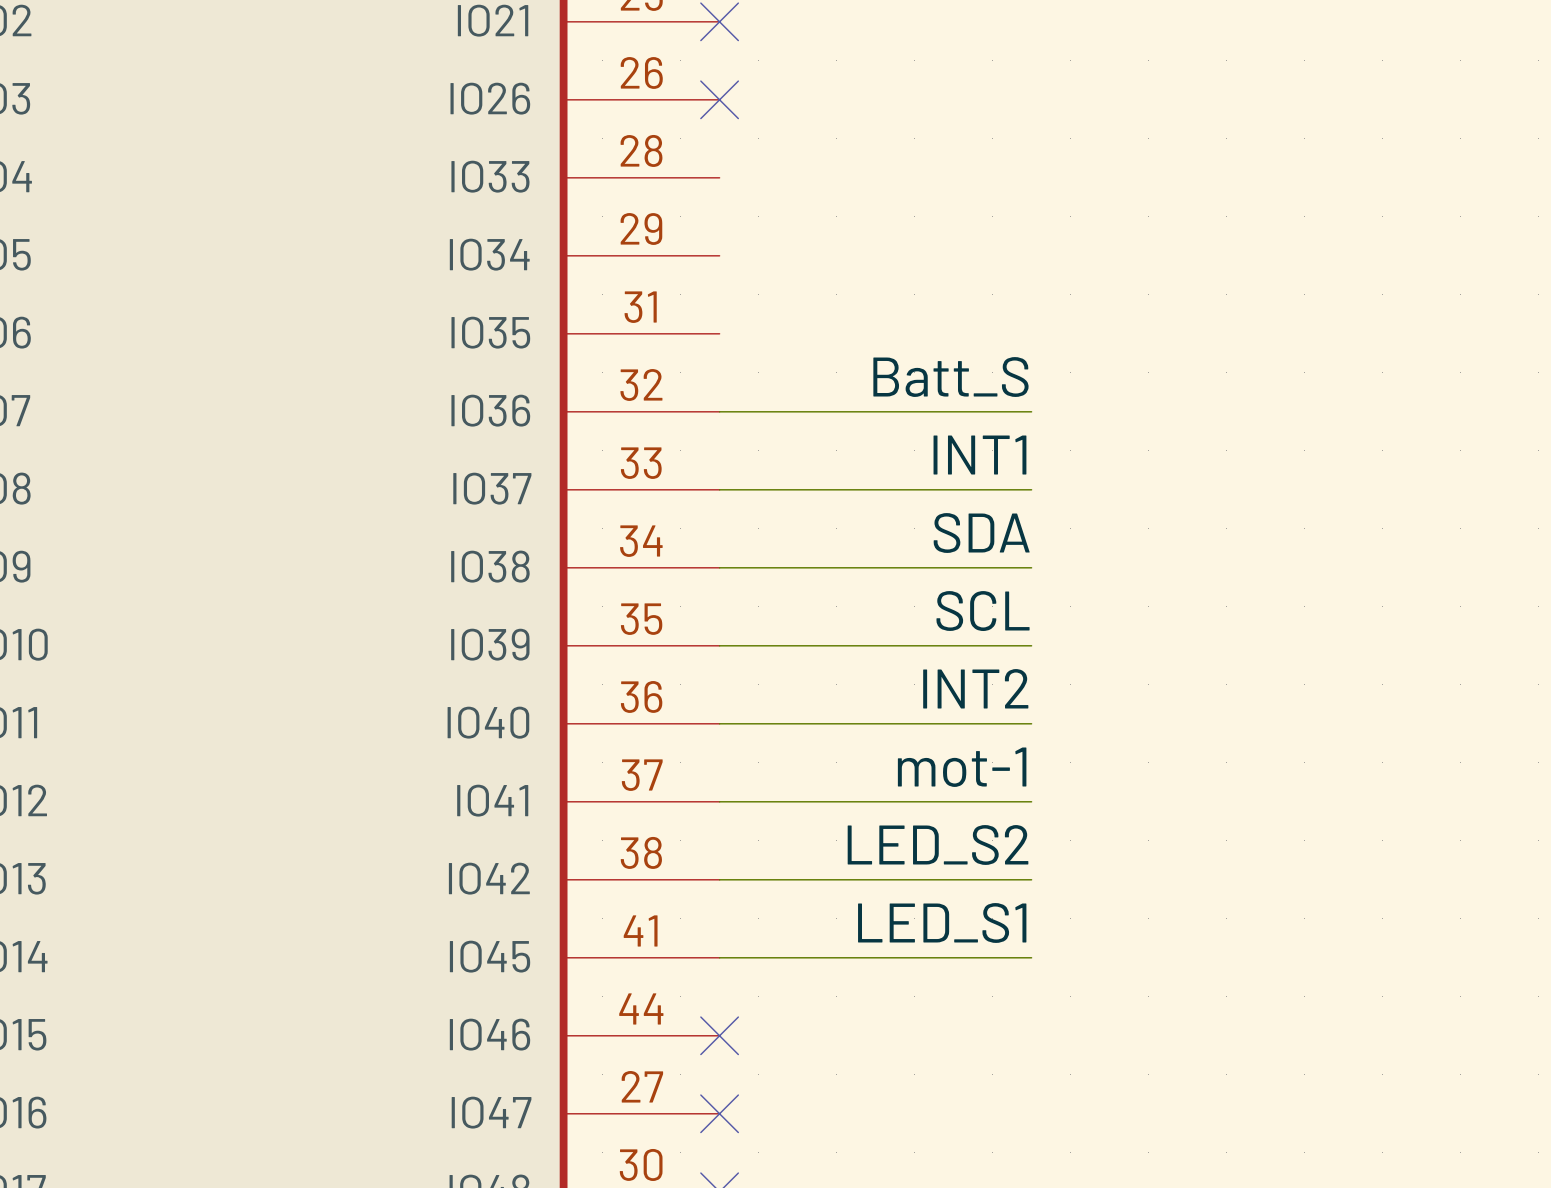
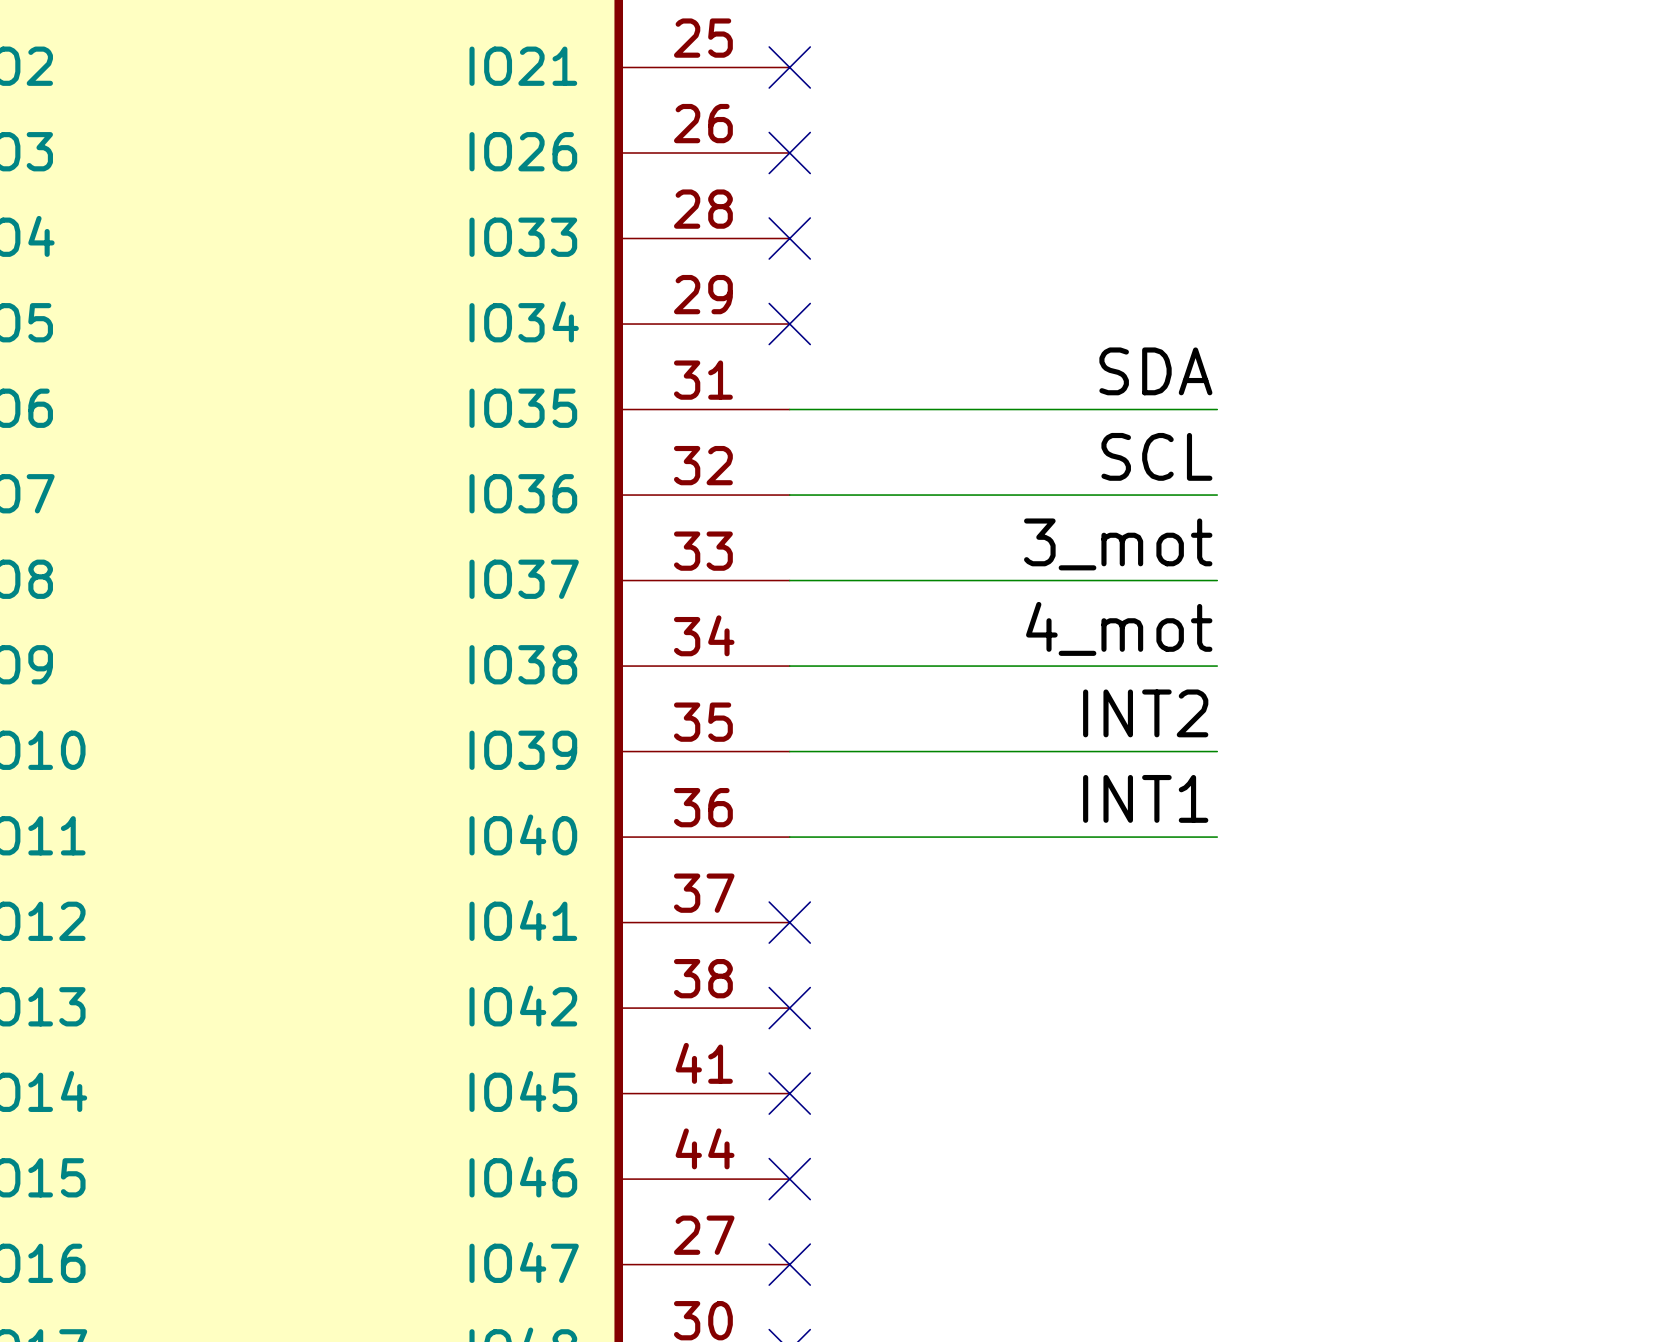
no-connect mark: none -> (789, 238)
no-connect mark: none -> (789, 324)
wire: none -> (789, 409) (1217, 409)
label: Batt_S (950, 377) -> none
wire: none -> (1131, 495) (1217, 495)
label position: INT1 (979, 455) -> INT1 (1145, 798)
label: none -> 3_mot (1118, 544)
wire: none -> (1131, 580) (1217, 580)
label position: SDA (981, 533) -> SDA (1155, 371)
label: none -> 4_mot (1119, 628)
wire: none -> (1131, 666) (1217, 666)
label position: SCL (983, 611) -> SCL (1156, 456)
wire: none -> (1131, 751) (1217, 751)
label position: INT2 (975, 688) -> INT2 (1145, 713)
wire: none -> (1131, 837) (1217, 837)
label: mot-1 (962, 767) -> none
wire: (719, 801) (1031, 801) -> none
no-connect mark: none -> (789, 922)
label: LED_S2 (938, 844) -> none
wire: (719, 879) (1031, 879) -> none
no-connect mark: none -> (789, 1008)
label: LED_S1 (942, 922) -> none
wire: (719, 957) (1031, 957) -> none
no-connect mark: none -> (789, 1093)

